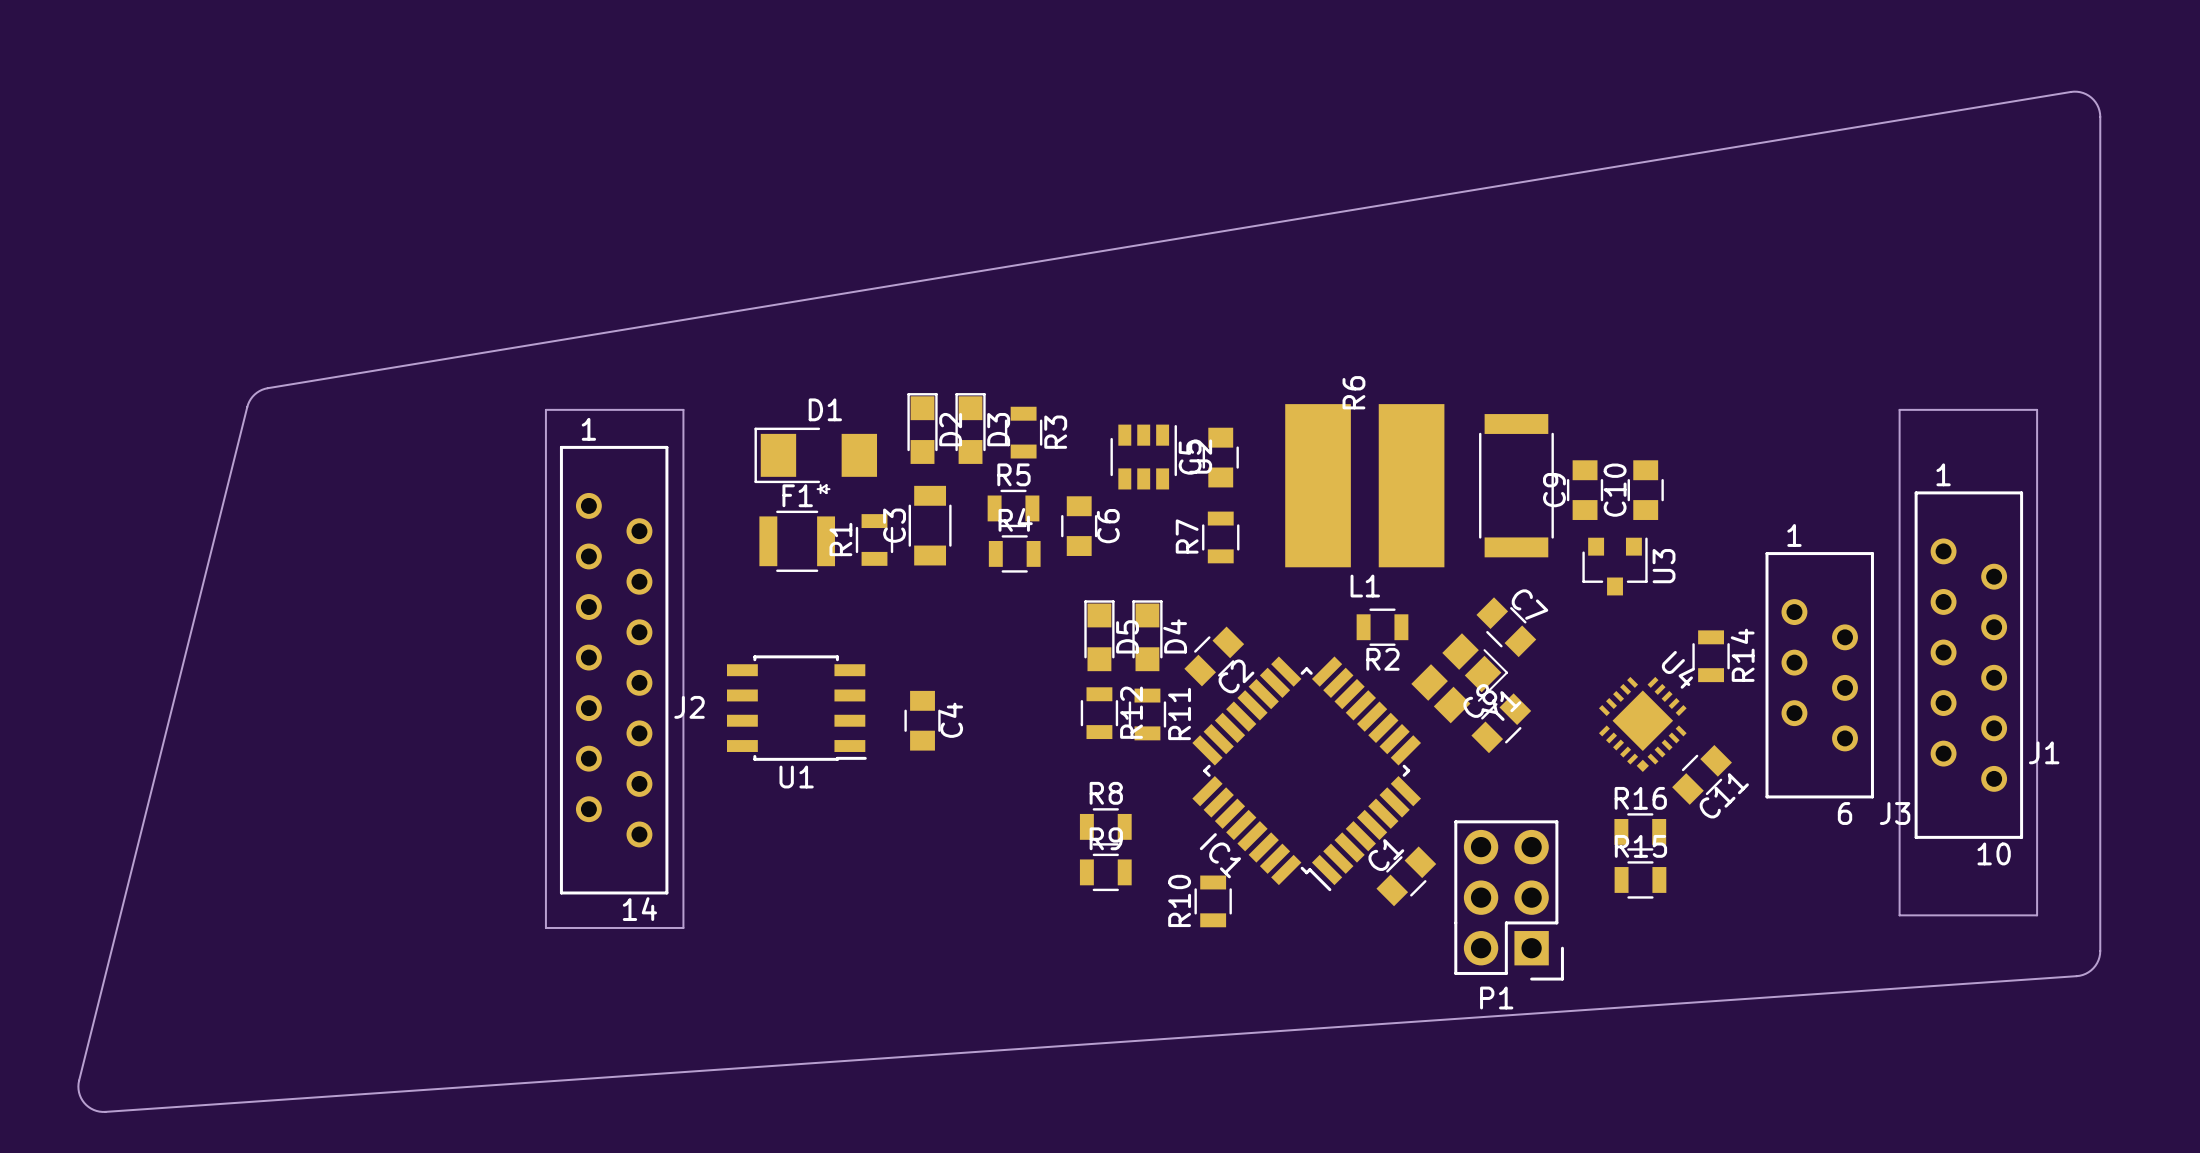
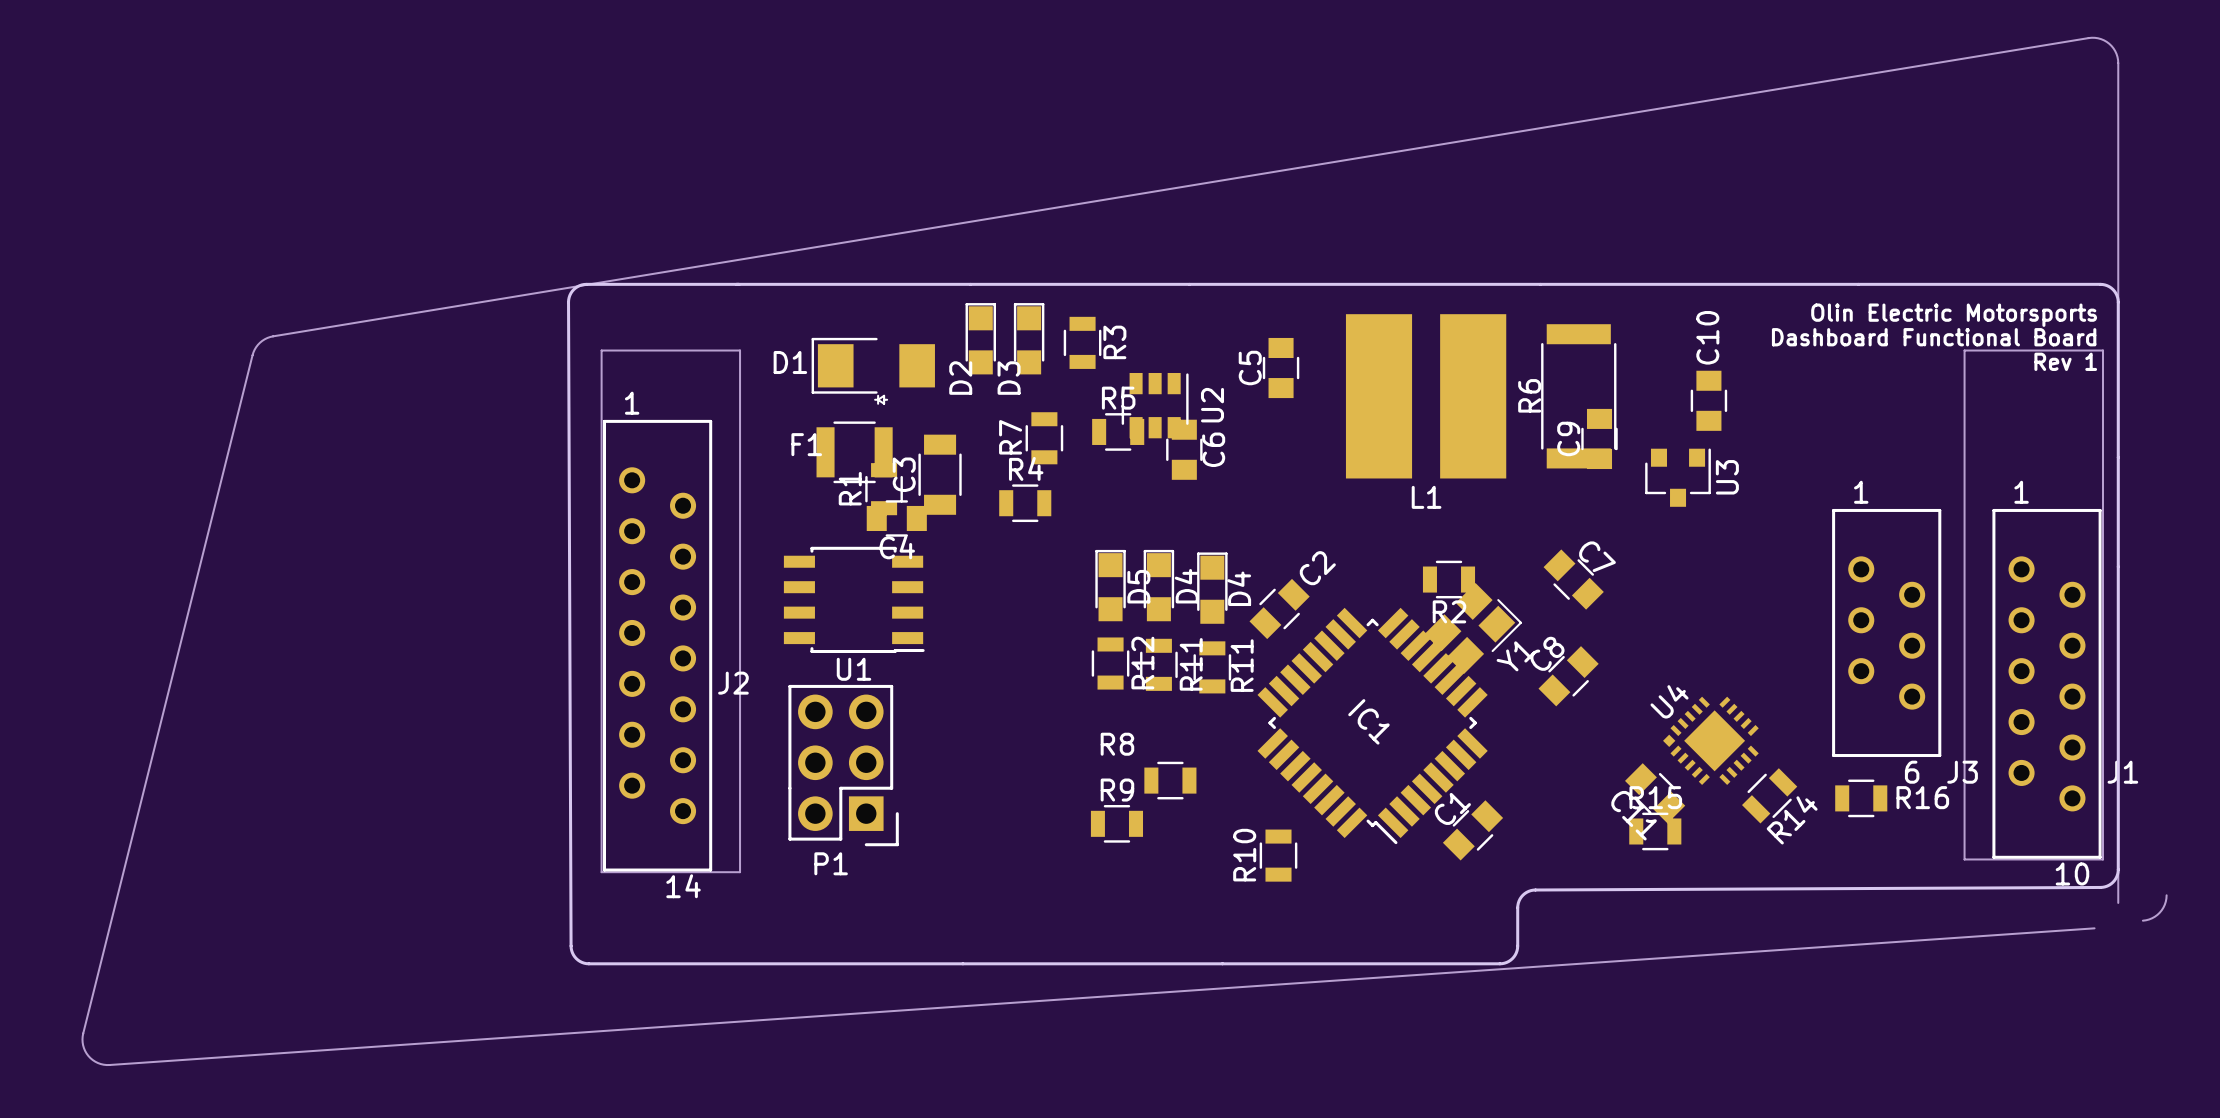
board edge: none -> (2118, 302) (2113, 289) (2100, 284) (579, 285) (570, 293) (568, 302) (572, 952) (578, 960) (588, 963) (1499, 963) (1508, 961) (1516, 952) (1518, 903) (1524, 893) (1533, 890) (2107, 886) (2115, 878) (2118, 869) (2118, 302)
text: none -> Olin Electric Motorsports (1954, 315)
text: none -> Dashboard Functional Board (1934, 337)
R6 name position: R6 (1353, 392) -> R6 (1529, 395)
line: (545, 409) (683, 409) (683, 927) (545, 927) (545, 409) -> (601, 350) (740, 350) (740, 872) (601, 872) (601, 350)
D1 name position: D1 (825, 409) -> D1 (790, 362)
line: (1899, 409) (1899, 915) (2037, 915) (2037, 409) (1899, 409) -> (1964, 350) (1964, 859) (2102, 859) (2102, 350) (1964, 350)
text: none -> Rev 1 (2065, 361)
D2 position: (922, 428) -> (980, 338)
D3 position: (970, 428) -> (1029, 338)
R3 position: (1023, 432) -> (1082, 342)
C5 position: (1220, 457) -> (1281, 368)
D1 position: (815, 460) -> (873, 371)
L1 position: (1364, 485) -> (1426, 396)
R6 position: (1516, 485) -> (1578, 396)
C10 name position: C10 (1615, 490) -> C10 (1707, 337)
C10 position: (1645, 490) -> (1708, 400)
R5 position: (1013, 508) -> (1118, 431)
C6 position: (1079, 526) -> (1184, 449)
R7 position: (1220, 537) -> (1044, 438)
F1 position: (797, 541) -> (854, 452)
U3 position: (1615, 566) -> (1678, 477)
R2 position: (1382, 627) -> (1449, 579)
C7 position: (1506, 627) -> (1573, 579)
D4: none -> (1212, 588)
C2 position: (1214, 656) -> (1279, 608)
R14 rotation: 0° (1711, 656) -> 45° clockwise (1769, 795)
R14 position: (1711, 656) -> (1769, 795)
J1 position: (1968, 665) -> (2047, 683)
U4 name position: U4 (1678, 669) -> U4 (1669, 701)
J2 position: (614, 670) -> (657, 645)
J3 position: (1819, 675) -> (1886, 632)
C2 name position: C2 (1236, 676) -> C2 (1317, 568)
U1 position: (796, 708) -> (854, 599)
R11: none -> (1212, 667)
C4 rotation: 0° (922, 720) -> 90° clockwise (896, 518)
C4 position: (922, 720) -> (896, 518)
C8 position: (1501, 723) -> (1568, 676)
U4 rotation: 0° (1642, 724) -> 90° clockwise (1710, 740)
U4 position: (1642, 724) -> (1710, 740)
IC1 position: (1306, 773) -> (1372, 725)
C11 rotation: 0° (1702, 774) -> 90° clockwise (1655, 793)
C11 position: (1702, 774) -> (1655, 793)
R16 name position: R16 (1640, 798) -> R16 (1922, 797)
R8 position: (1105, 826) -> (1170, 780)
R16 position: (1640, 831) -> (1861, 798)
IC1 name position: IC1 (1220, 855) -> IC1 (1368, 721)
C1 position: (1406, 876) -> (1473, 830)
P1 position: (1509, 900) -> (843, 765)
R10 position: (1213, 901) -> (1278, 855)
line: (2100, 950) (2098, 960) (2093, 968) (2085, 973) (2076, 976) -> (2166, 895) (2164, 904) (2159, 912) (2152, 918) (2142, 920)

